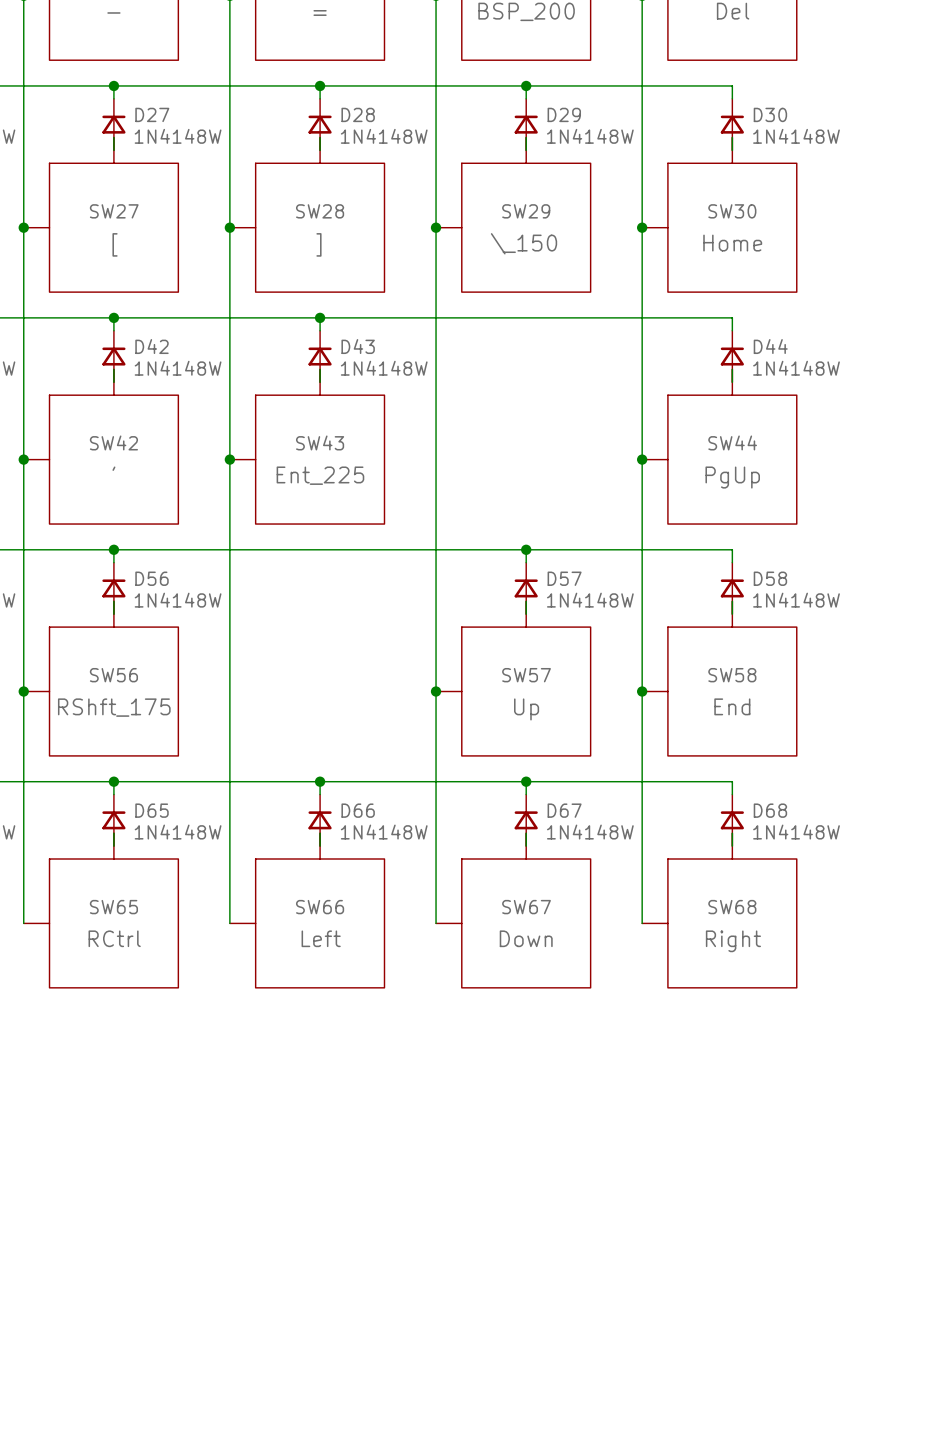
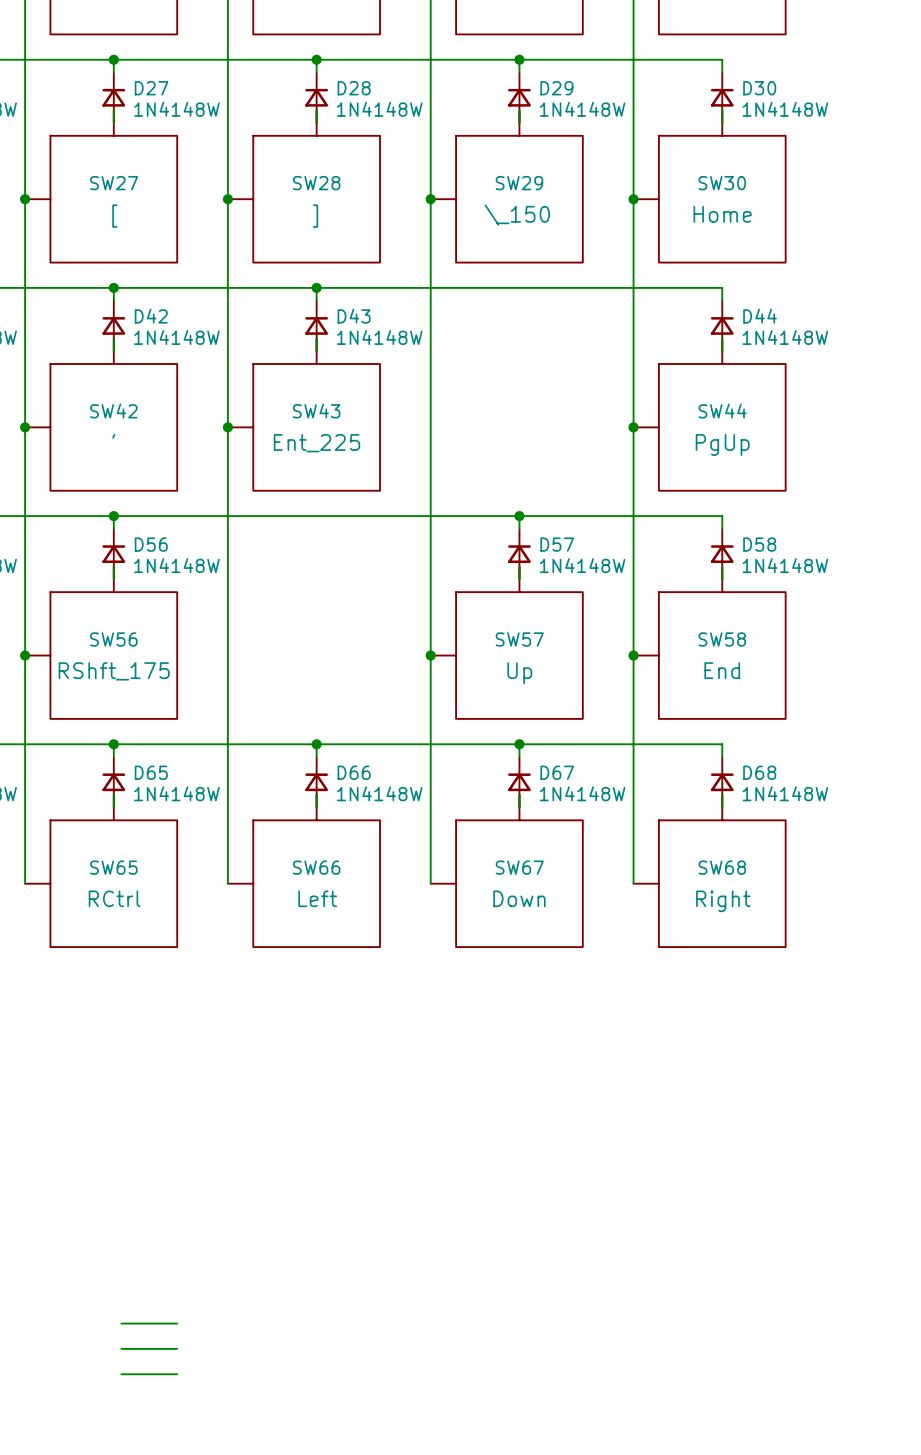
wire: none -> (121, 1323) (177, 1323)
wire: none -> (121, 1348) (177, 1348)
wire: none -> (121, 1374) (177, 1374)

